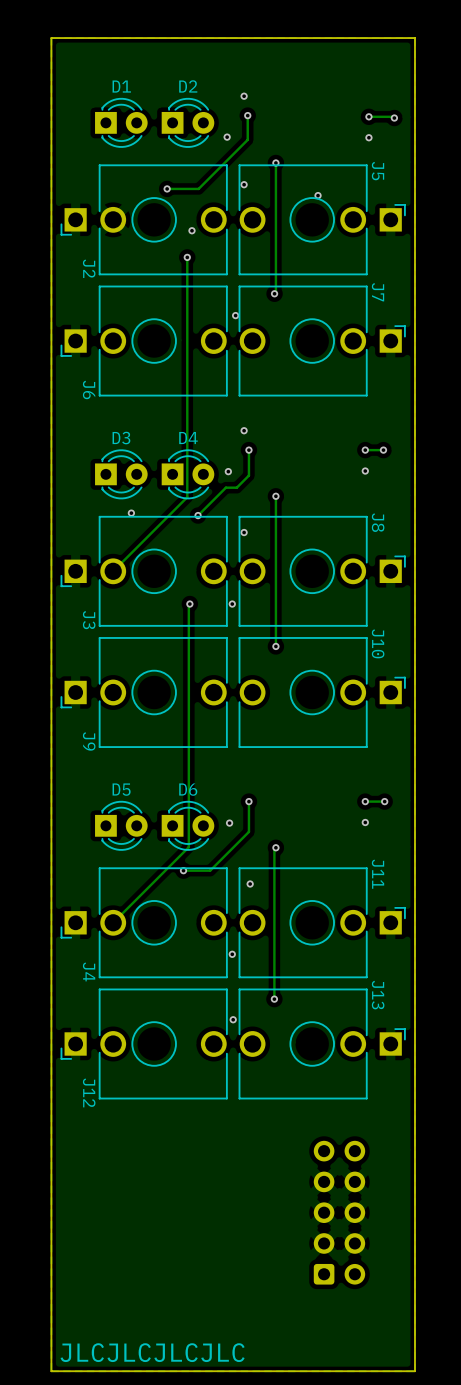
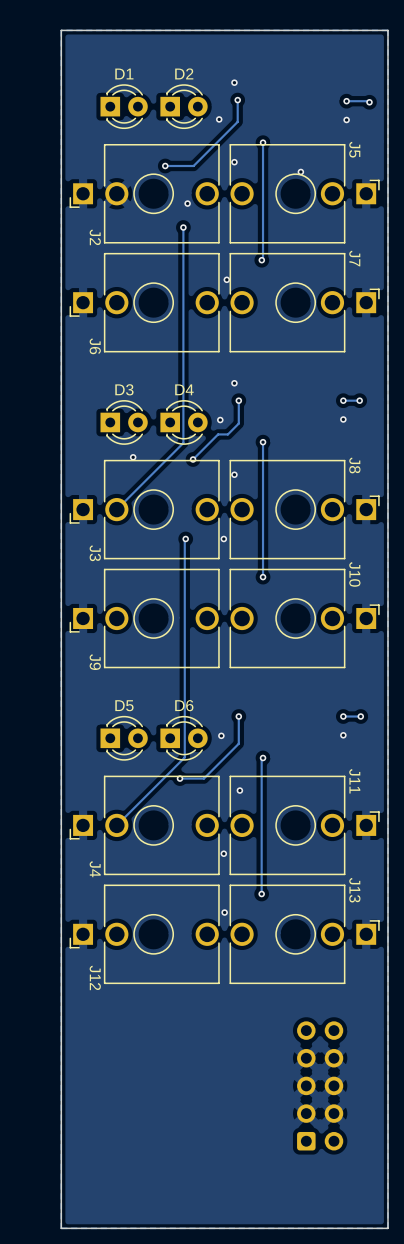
text: JLCJLCJLCJLC (152, 1352) -> none

